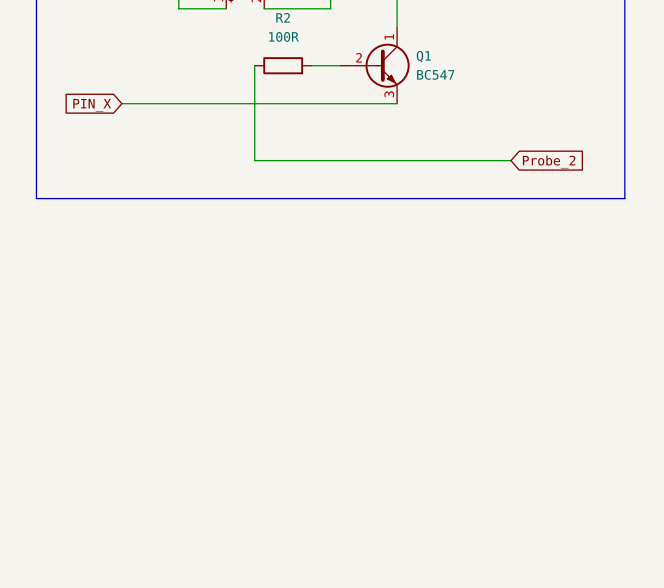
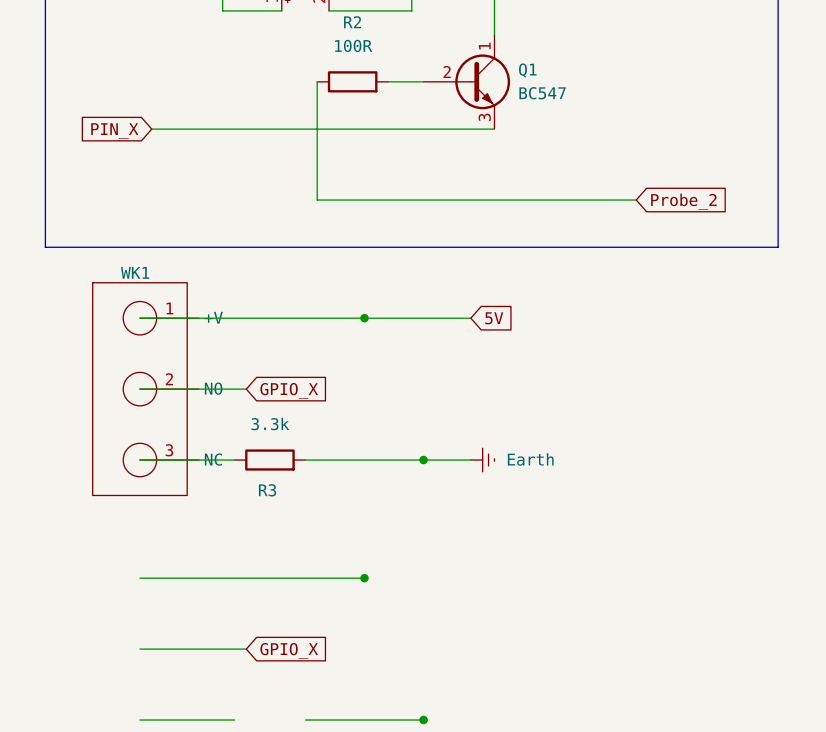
wire: none -> (139, 318) (470, 318)
junction: none -> (364, 318)
global label: none -> 5V (494, 318)
wire: none -> (139, 389) (246, 389)
WK1: none -> (145, 389)
global label: none -> GPIO_X (289, 390)
wire: none -> (139, 460) (234, 460)
R3: none -> 3.3k (269, 460)
wire: none -> (305, 460) (470, 460)
junction: none -> (423, 460)
power symbol: none -> Earth (482, 460)
wire: none -> (139, 578) (364, 578)
junction: none -> (364, 578)
wire: none -> (139, 649) (246, 649)
global label: none -> GPIO_X (289, 650)
wire: none -> (139, 720) (234, 720)
wire: none -> (305, 720) (423, 720)
junction: none -> (423, 720)

